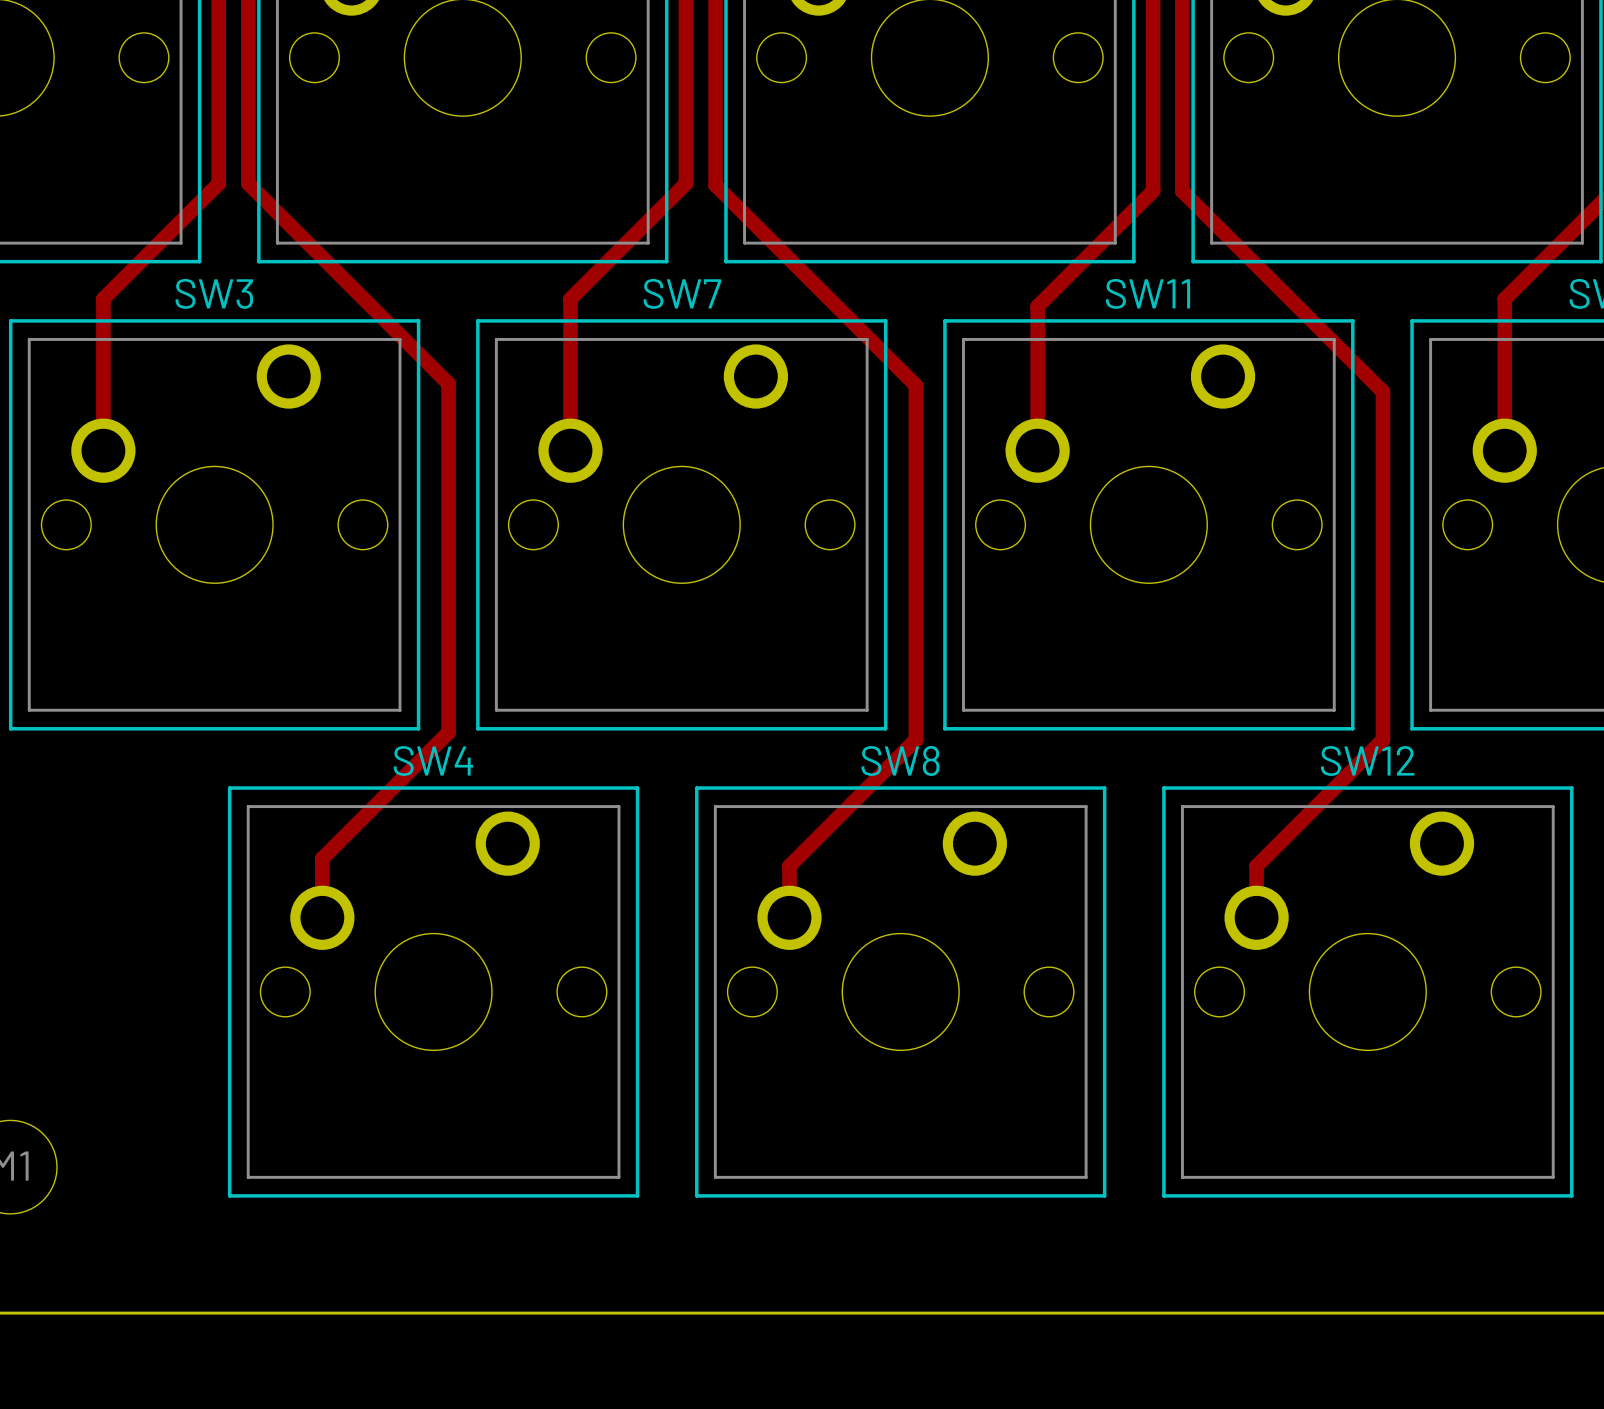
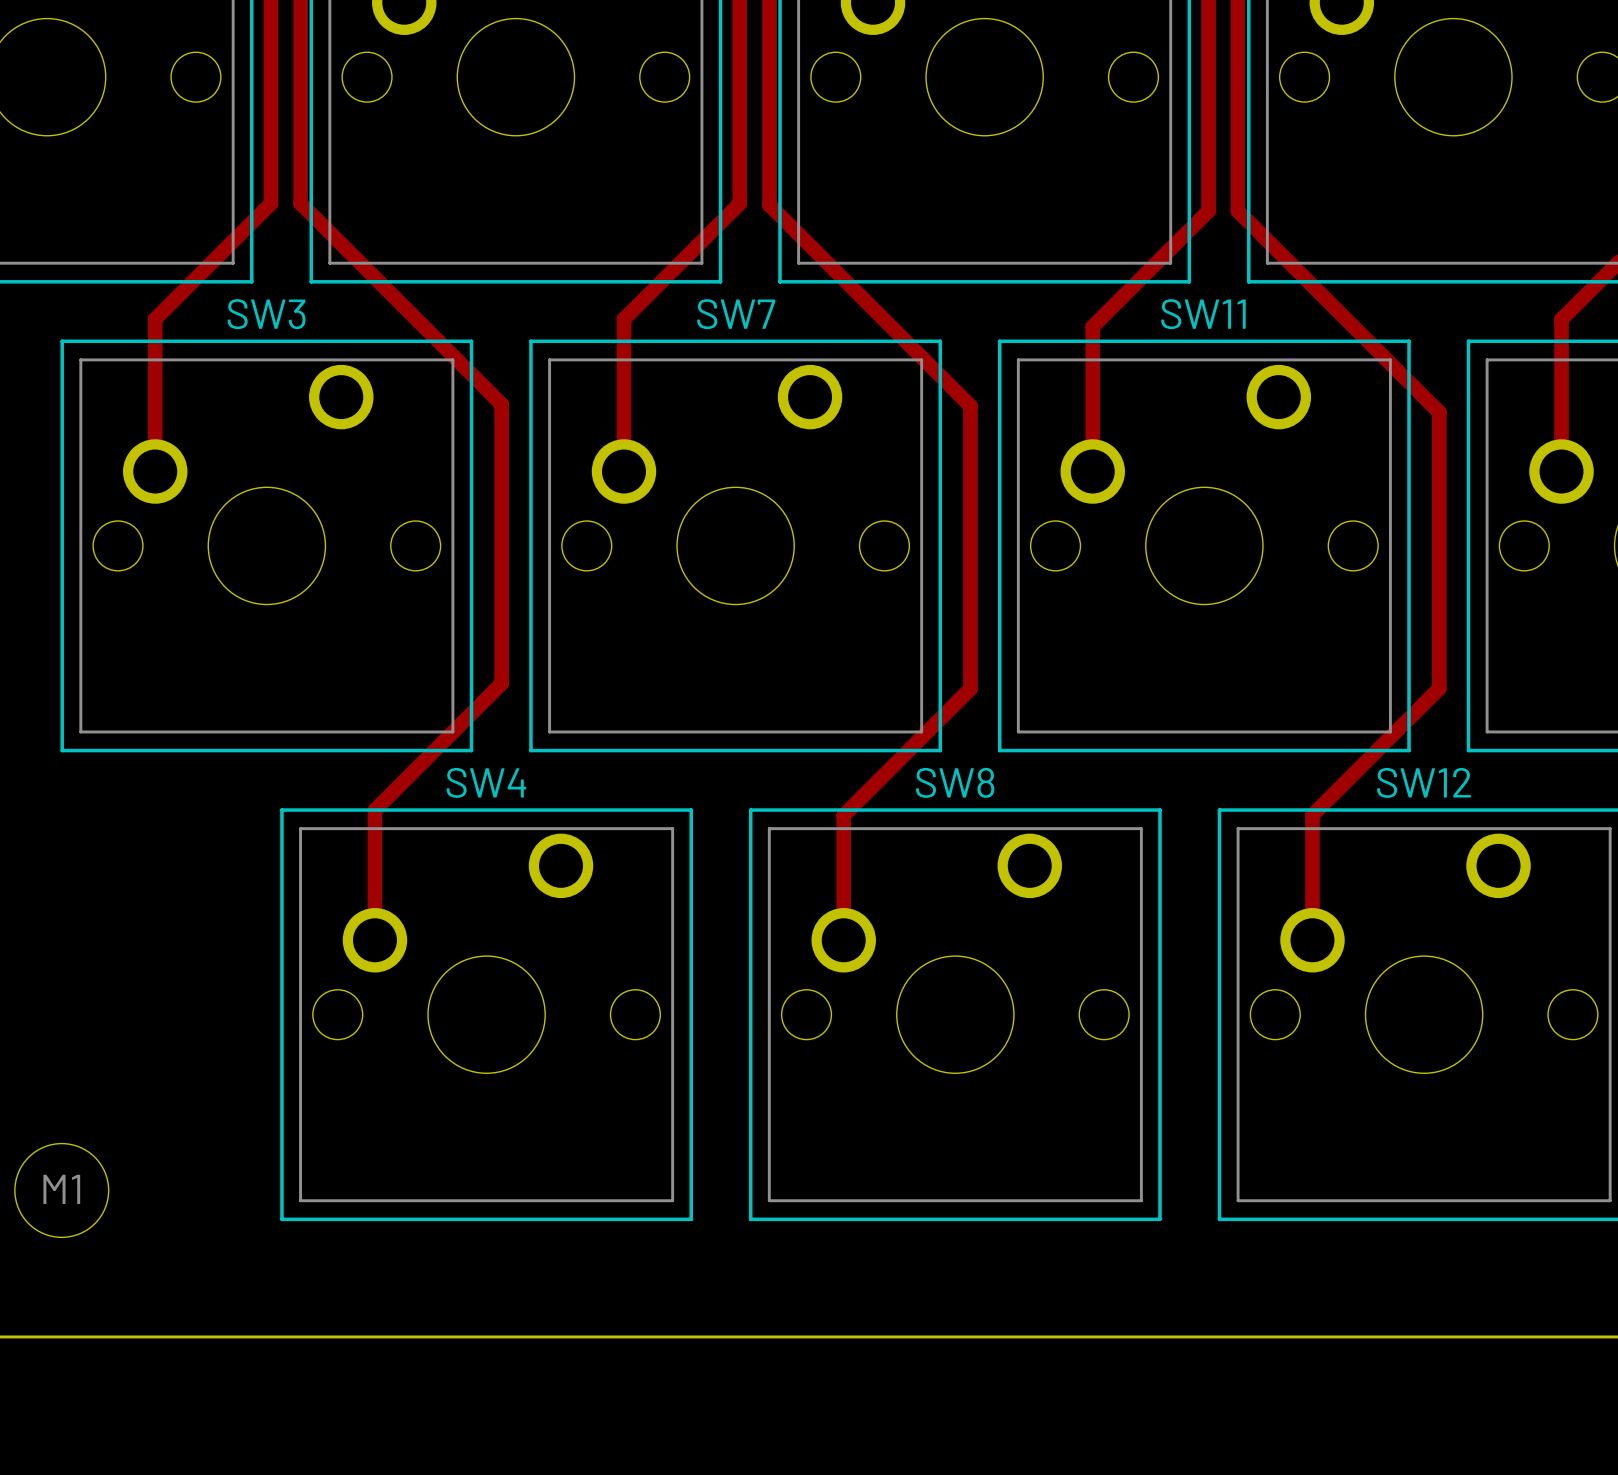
track: (448, 661) (448, 732) (322, 858) -> (501, 683) (374, 810) (374, 880)
track: (1382, 666) (1382, 739) (1256, 866) -> (1439, 688) (1312, 815) (1312, 888)
track: (915, 667) (915, 739) (789, 866) -> (970, 688) (843, 815) (843, 888)

